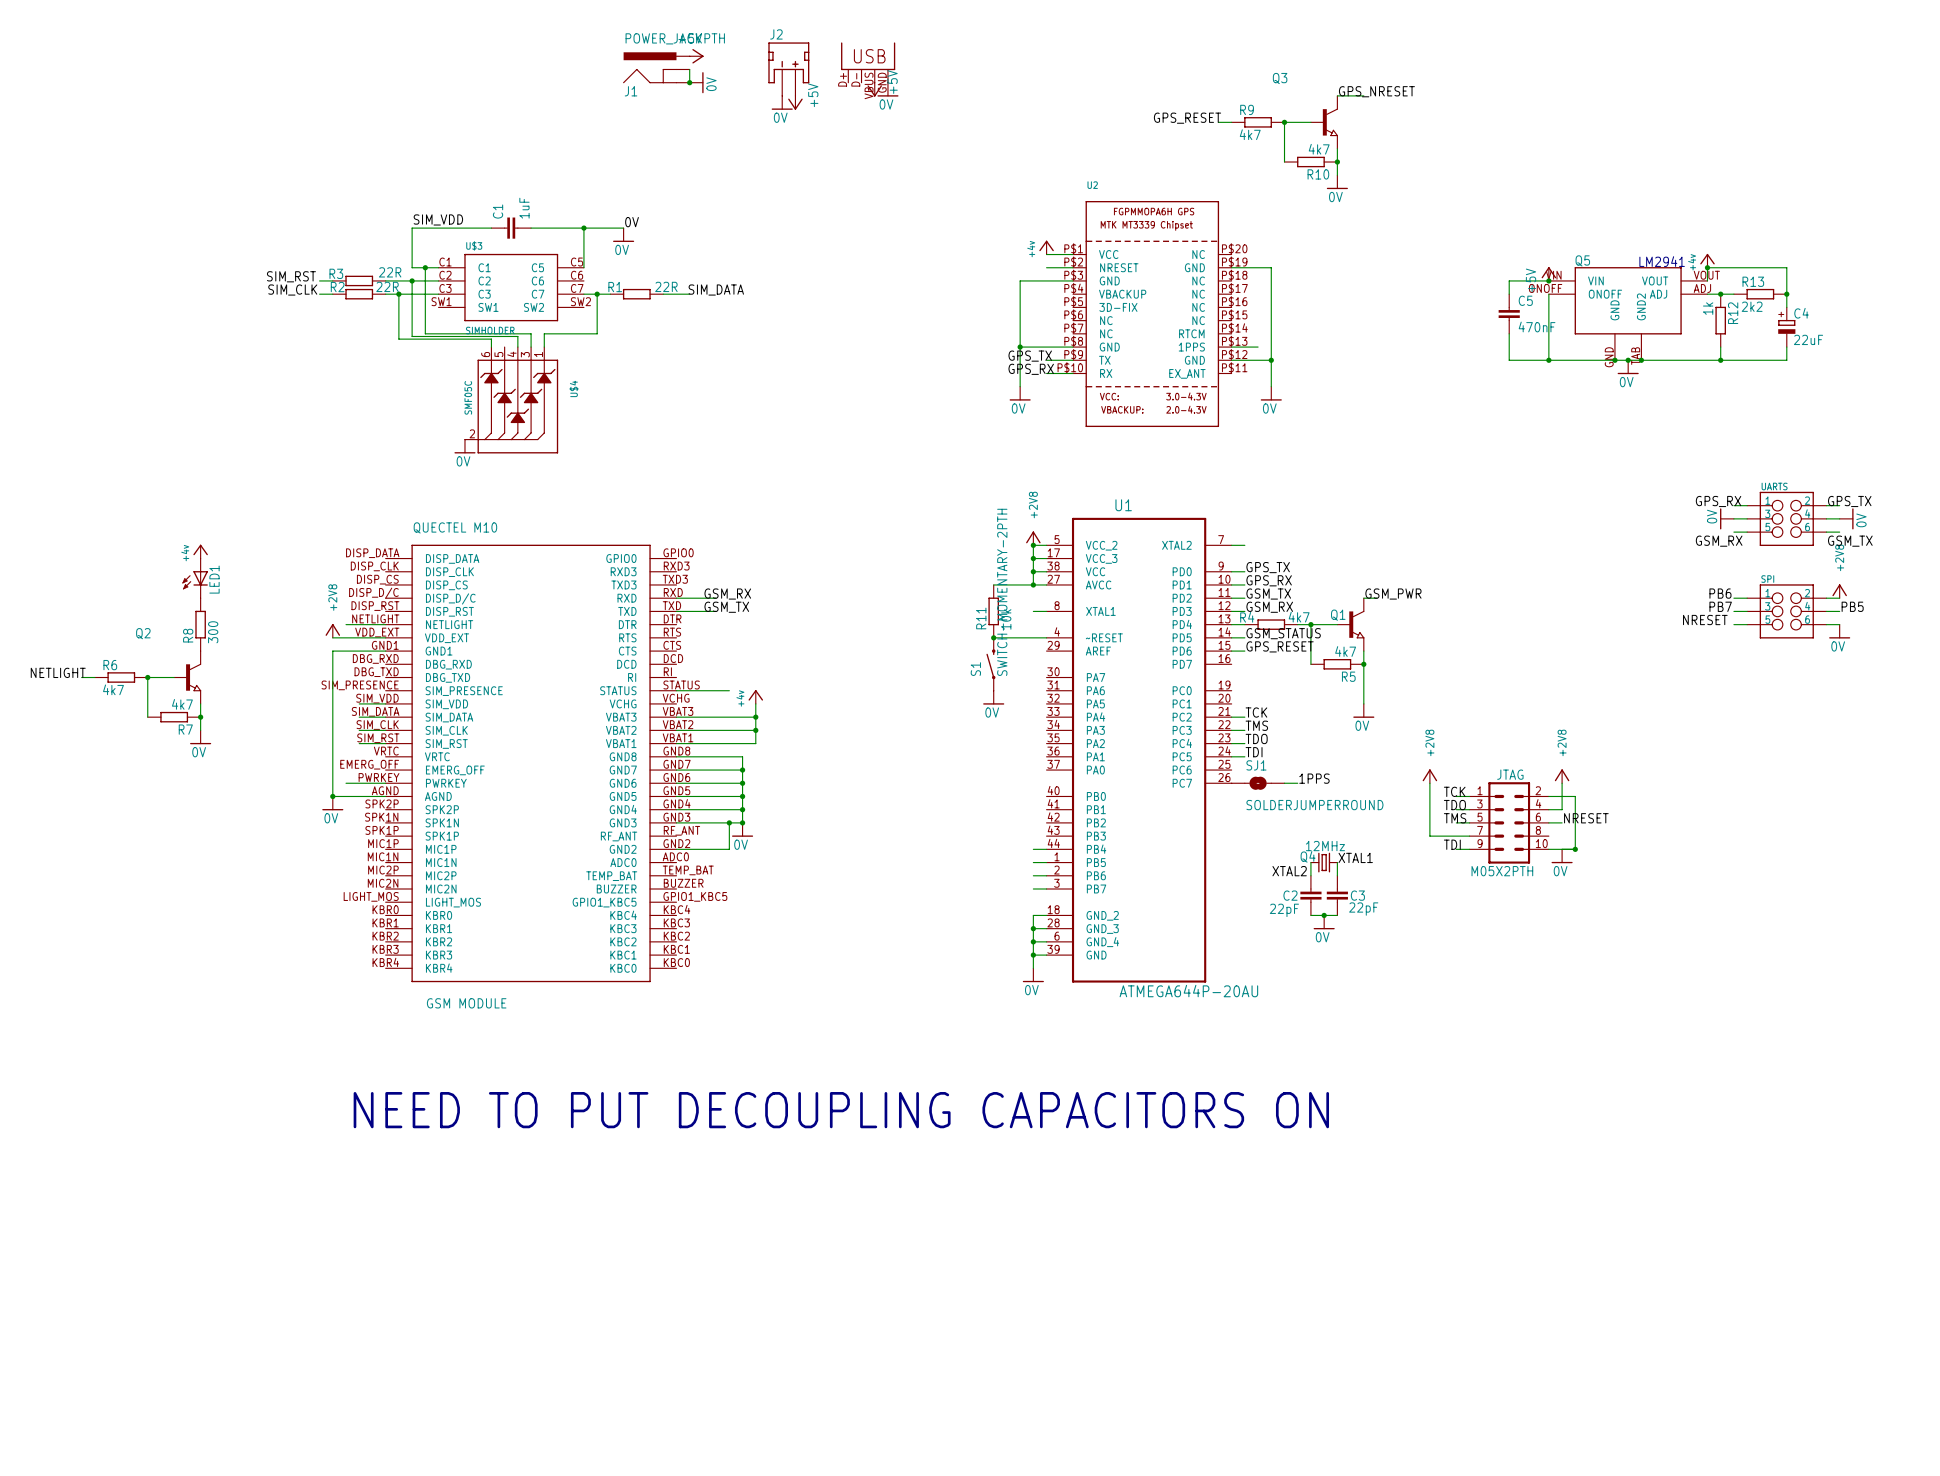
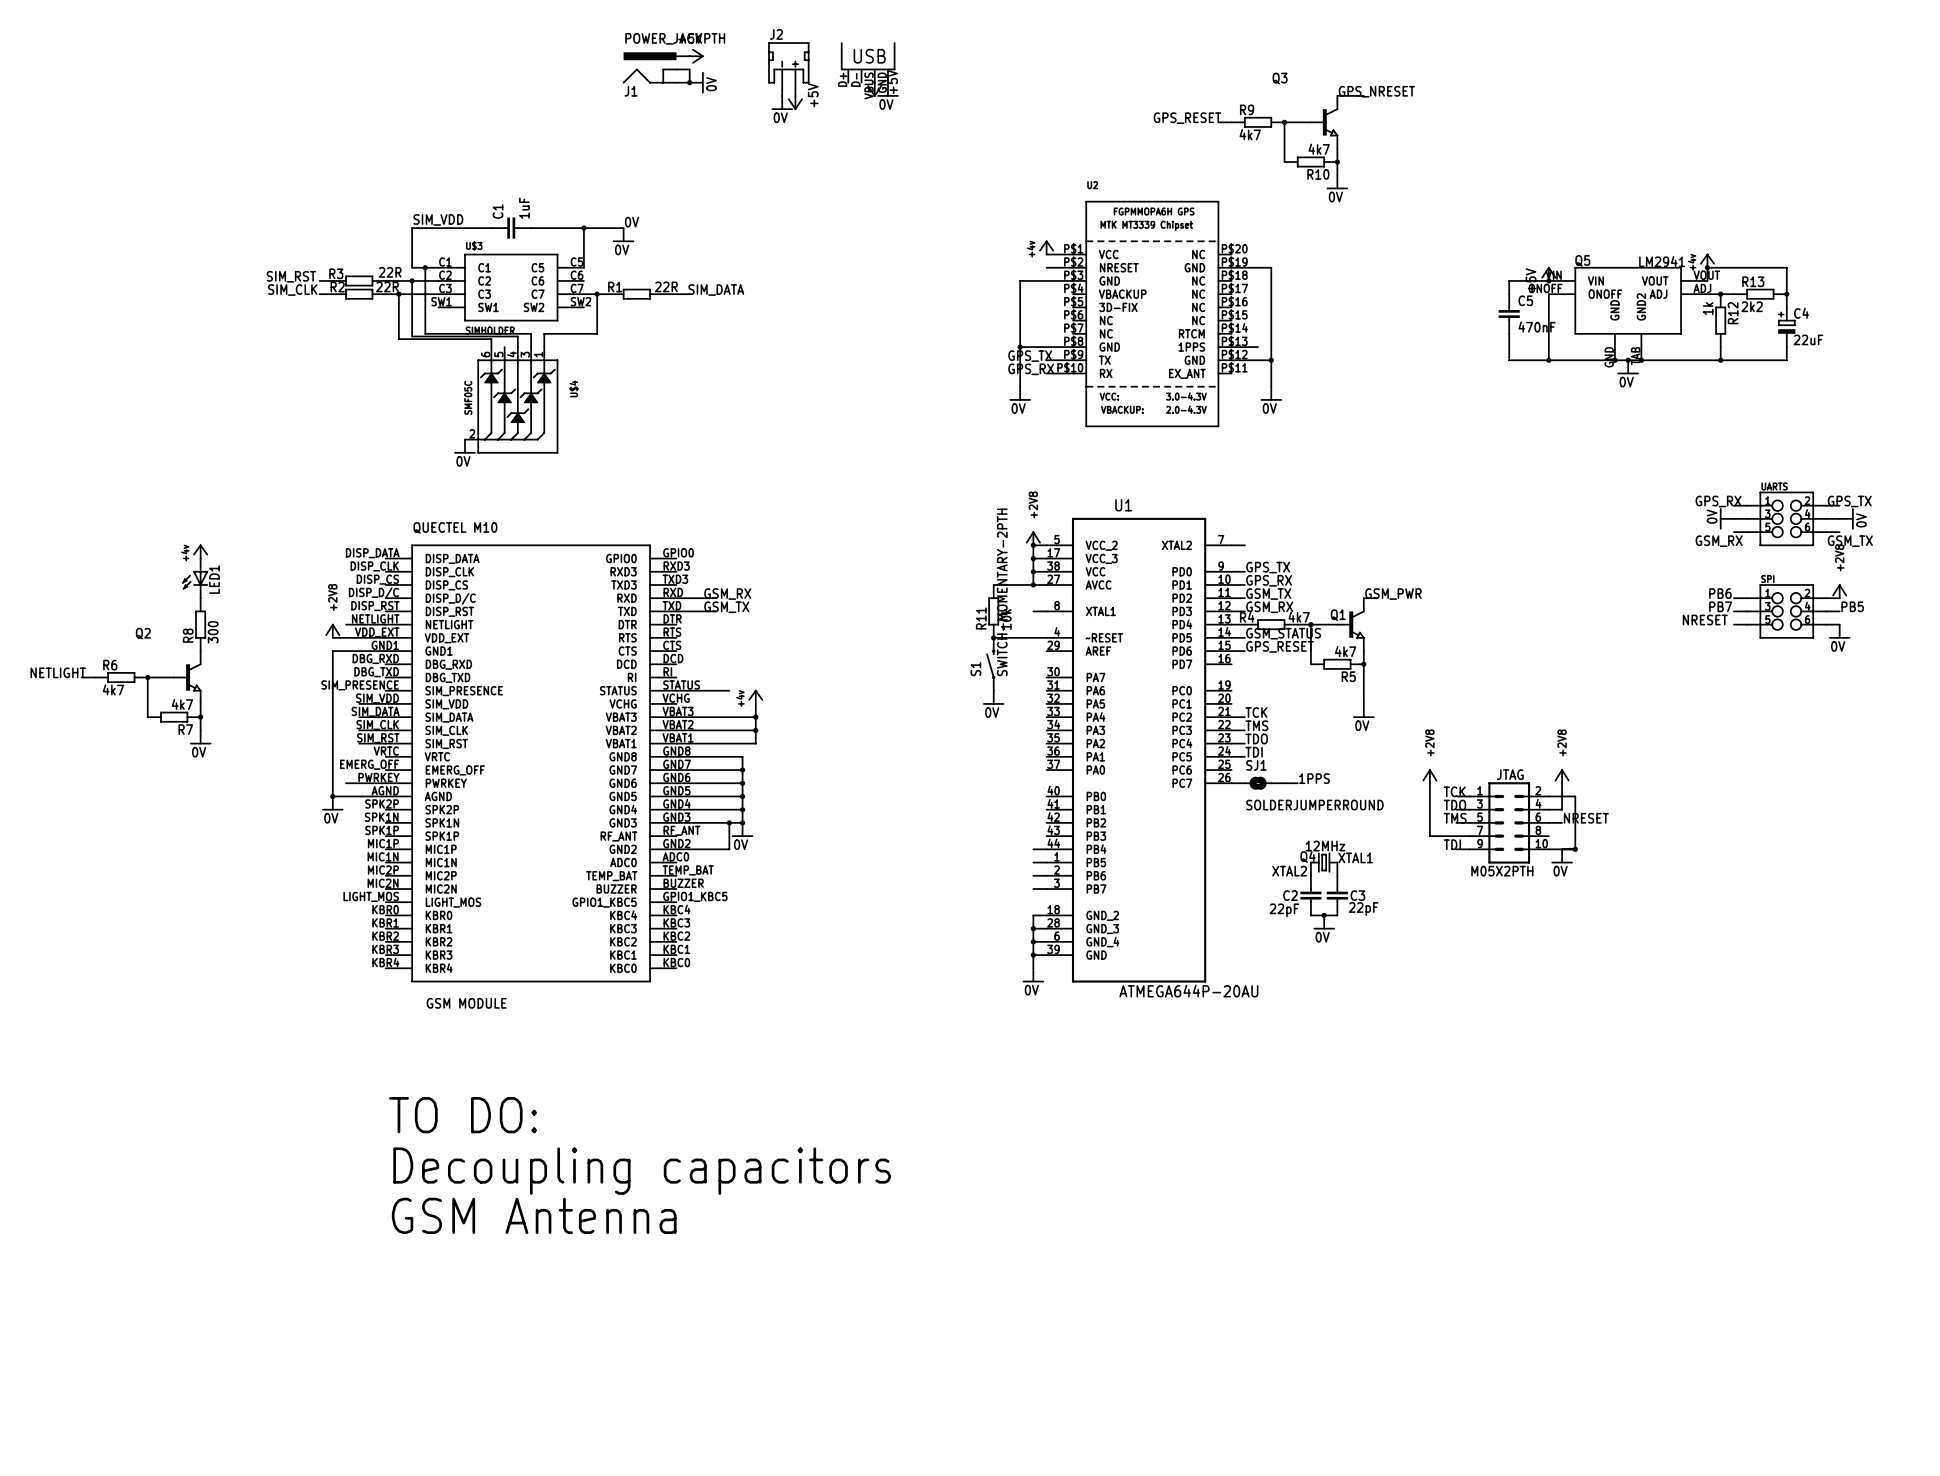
text: NEED TO PUT DECOUPLING CAPACITORS ON (841, 1110) -> none
text: none -> TO DO: (462, 1115)
text: none -> Decoupling capacitors (642, 1171)
text: none -> GSM Antenna (534, 1215)

